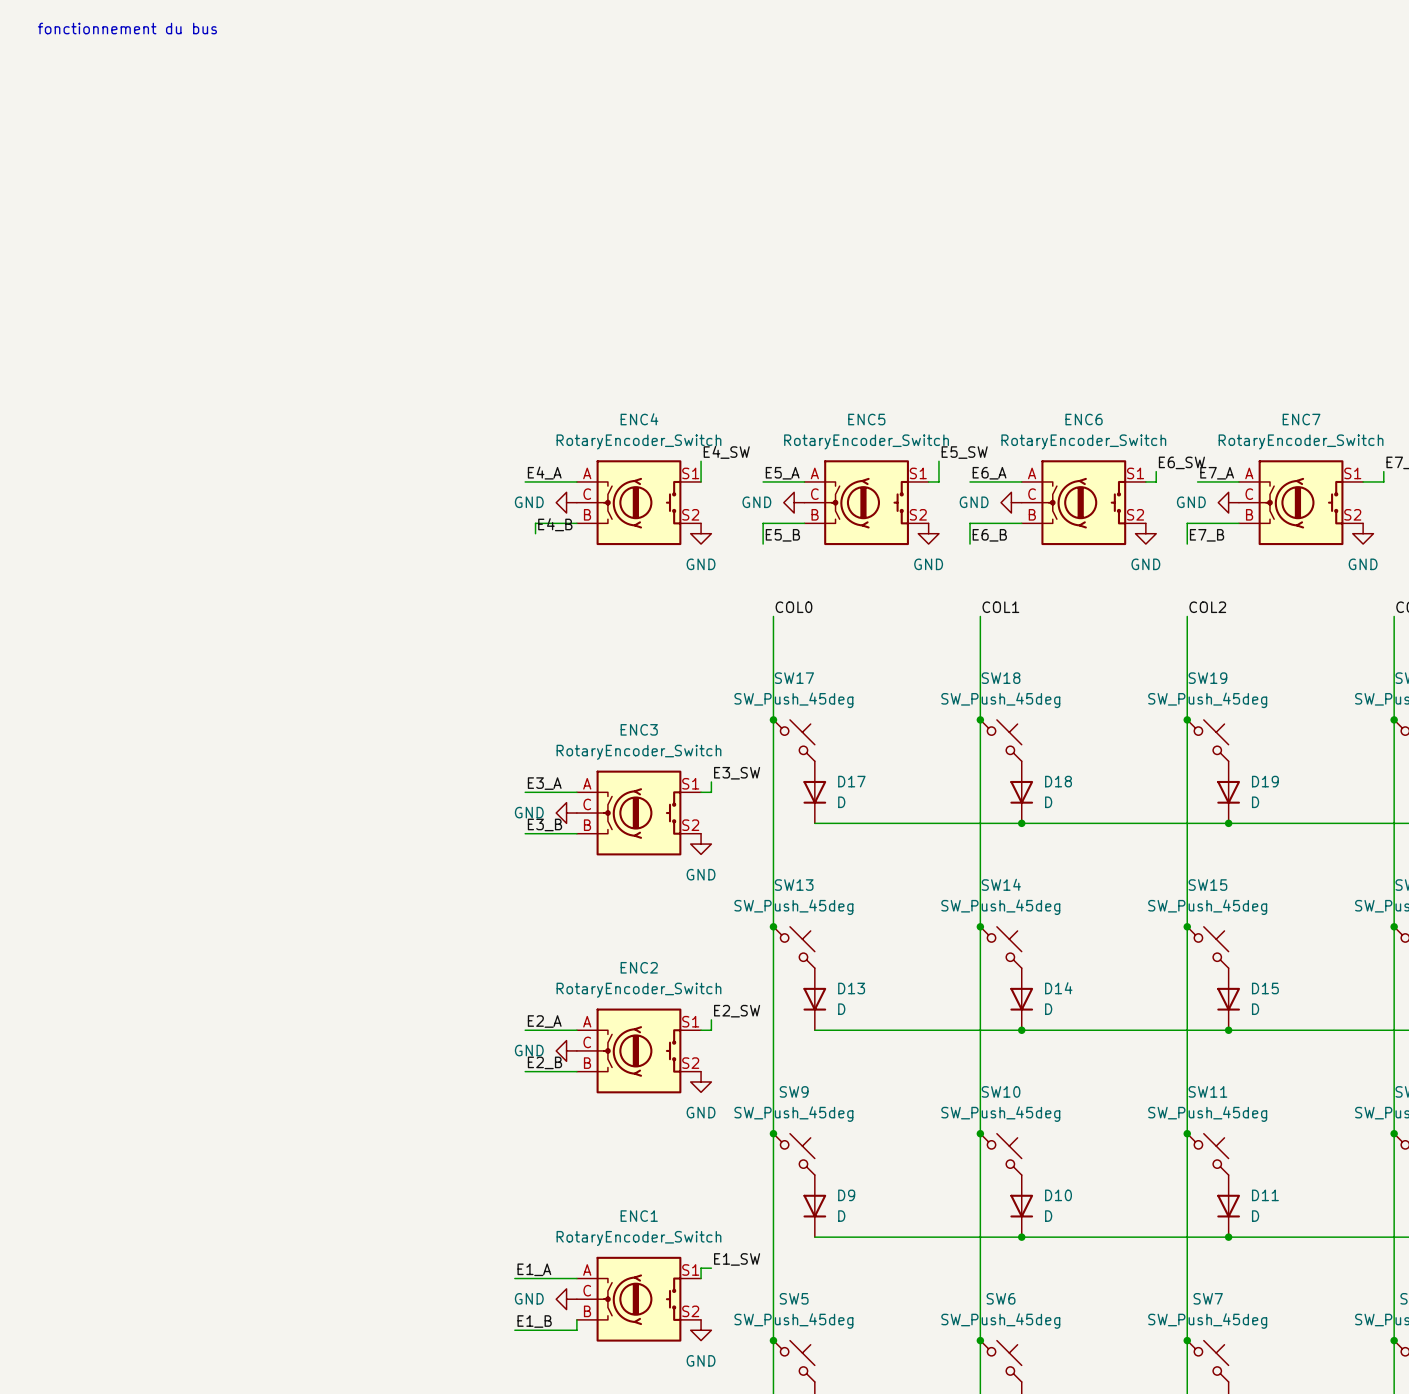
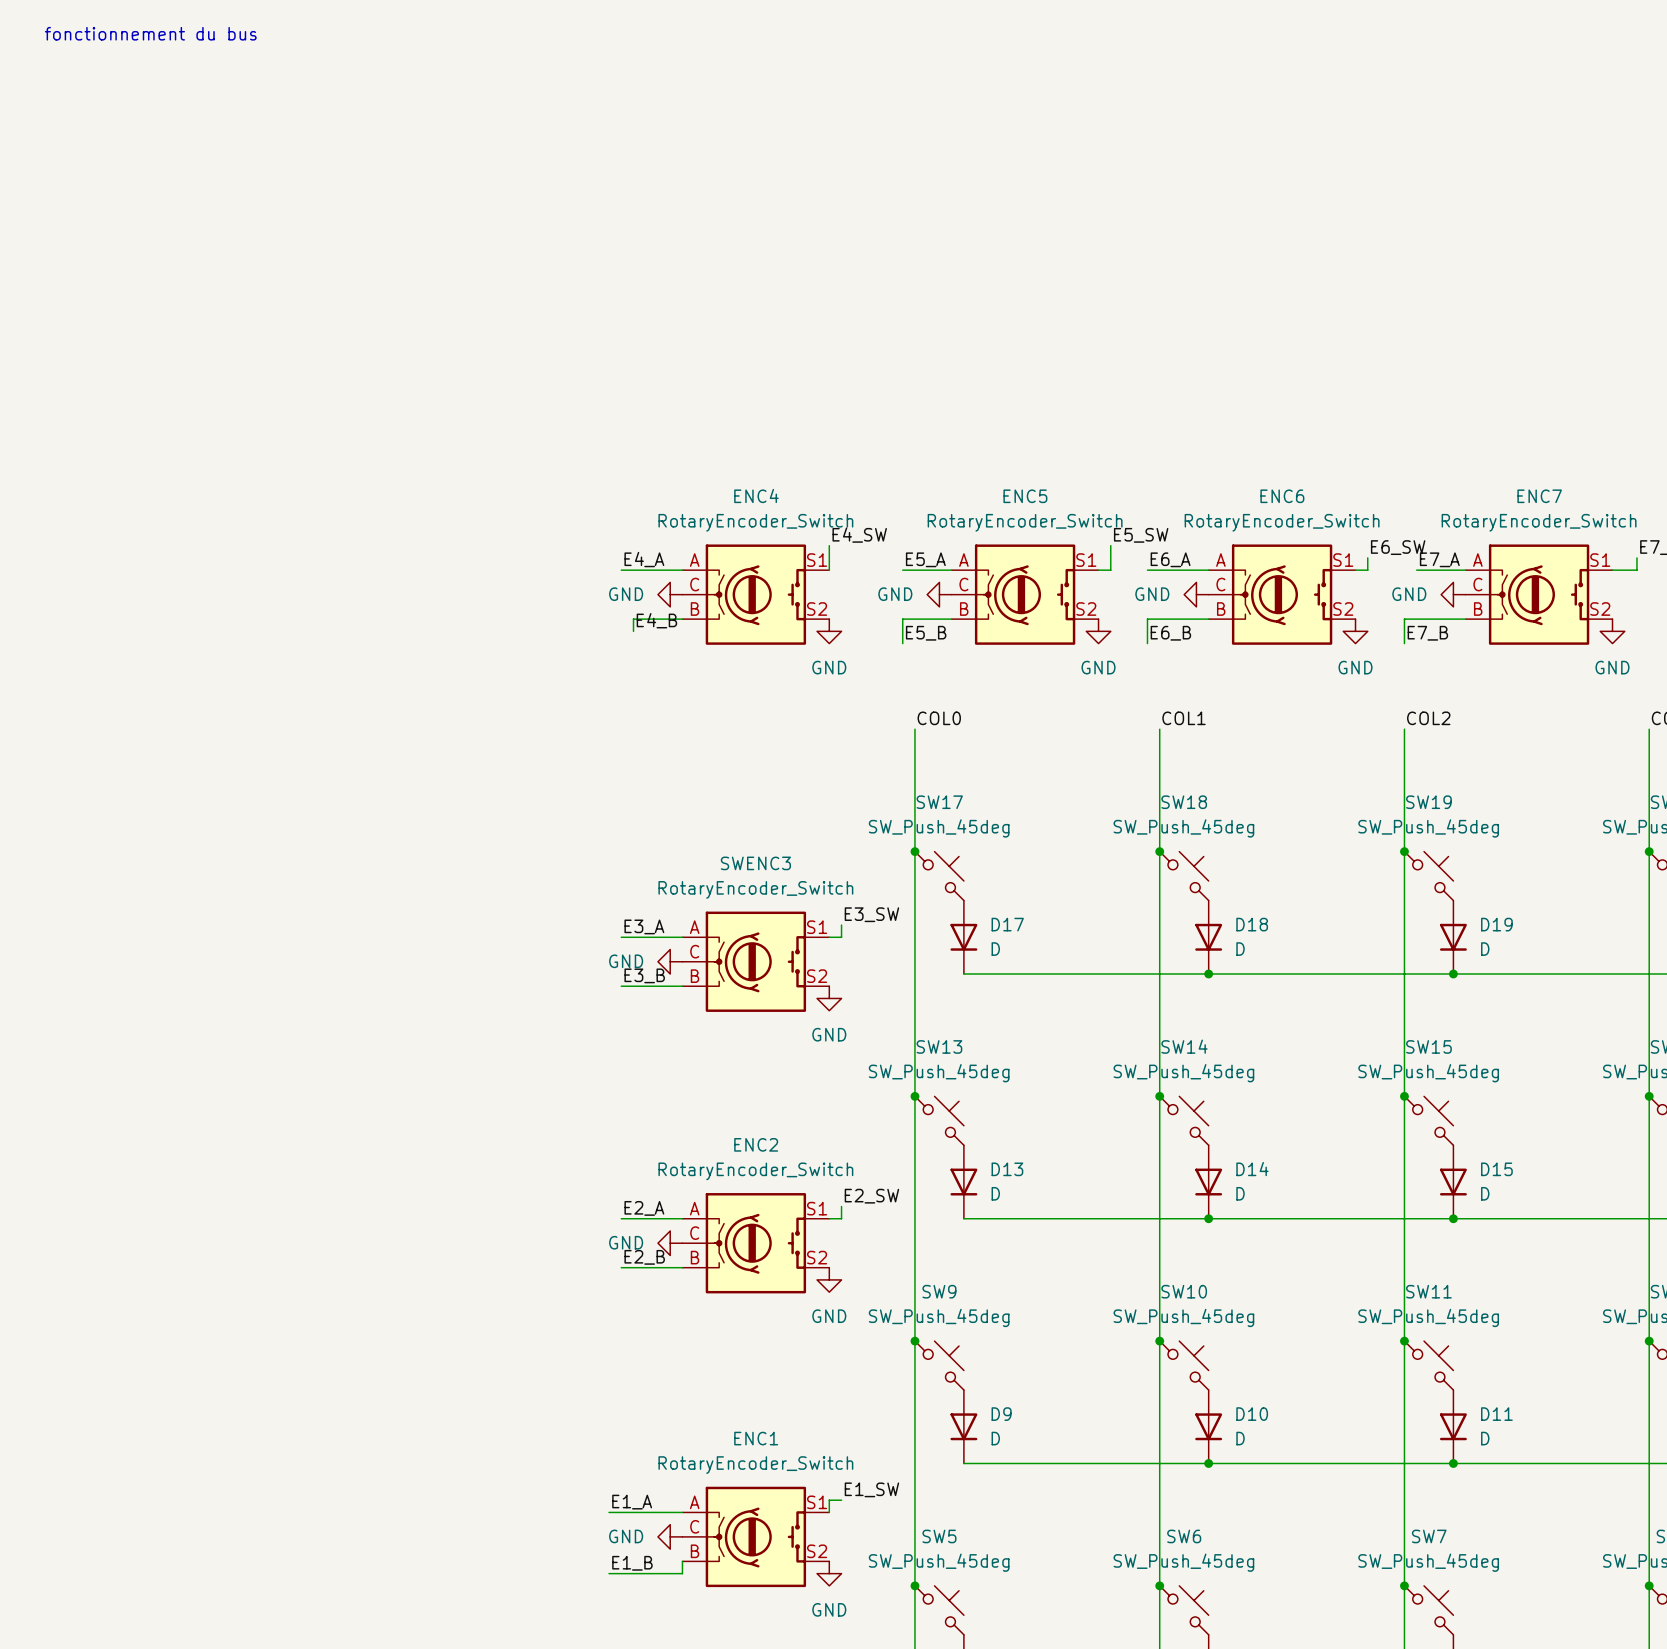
ENC3 name: ENC3 (639, 729) -> SWENC3 (755, 863)

